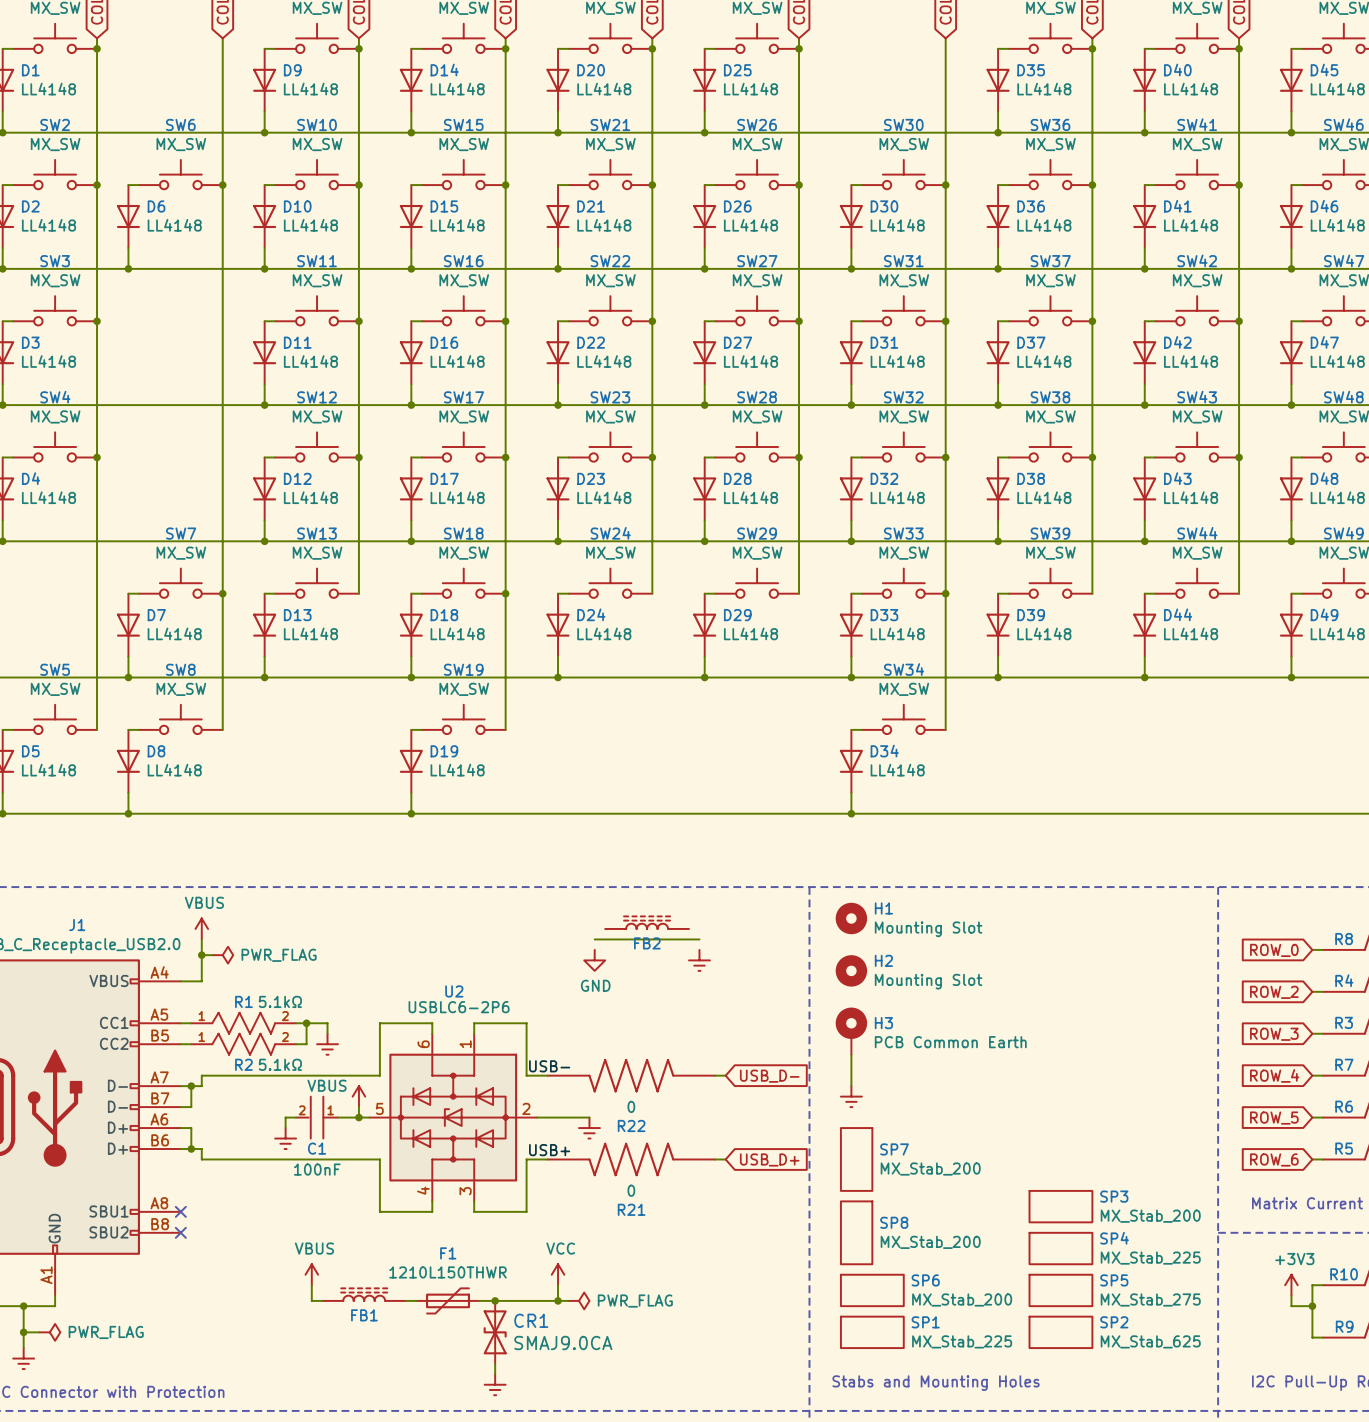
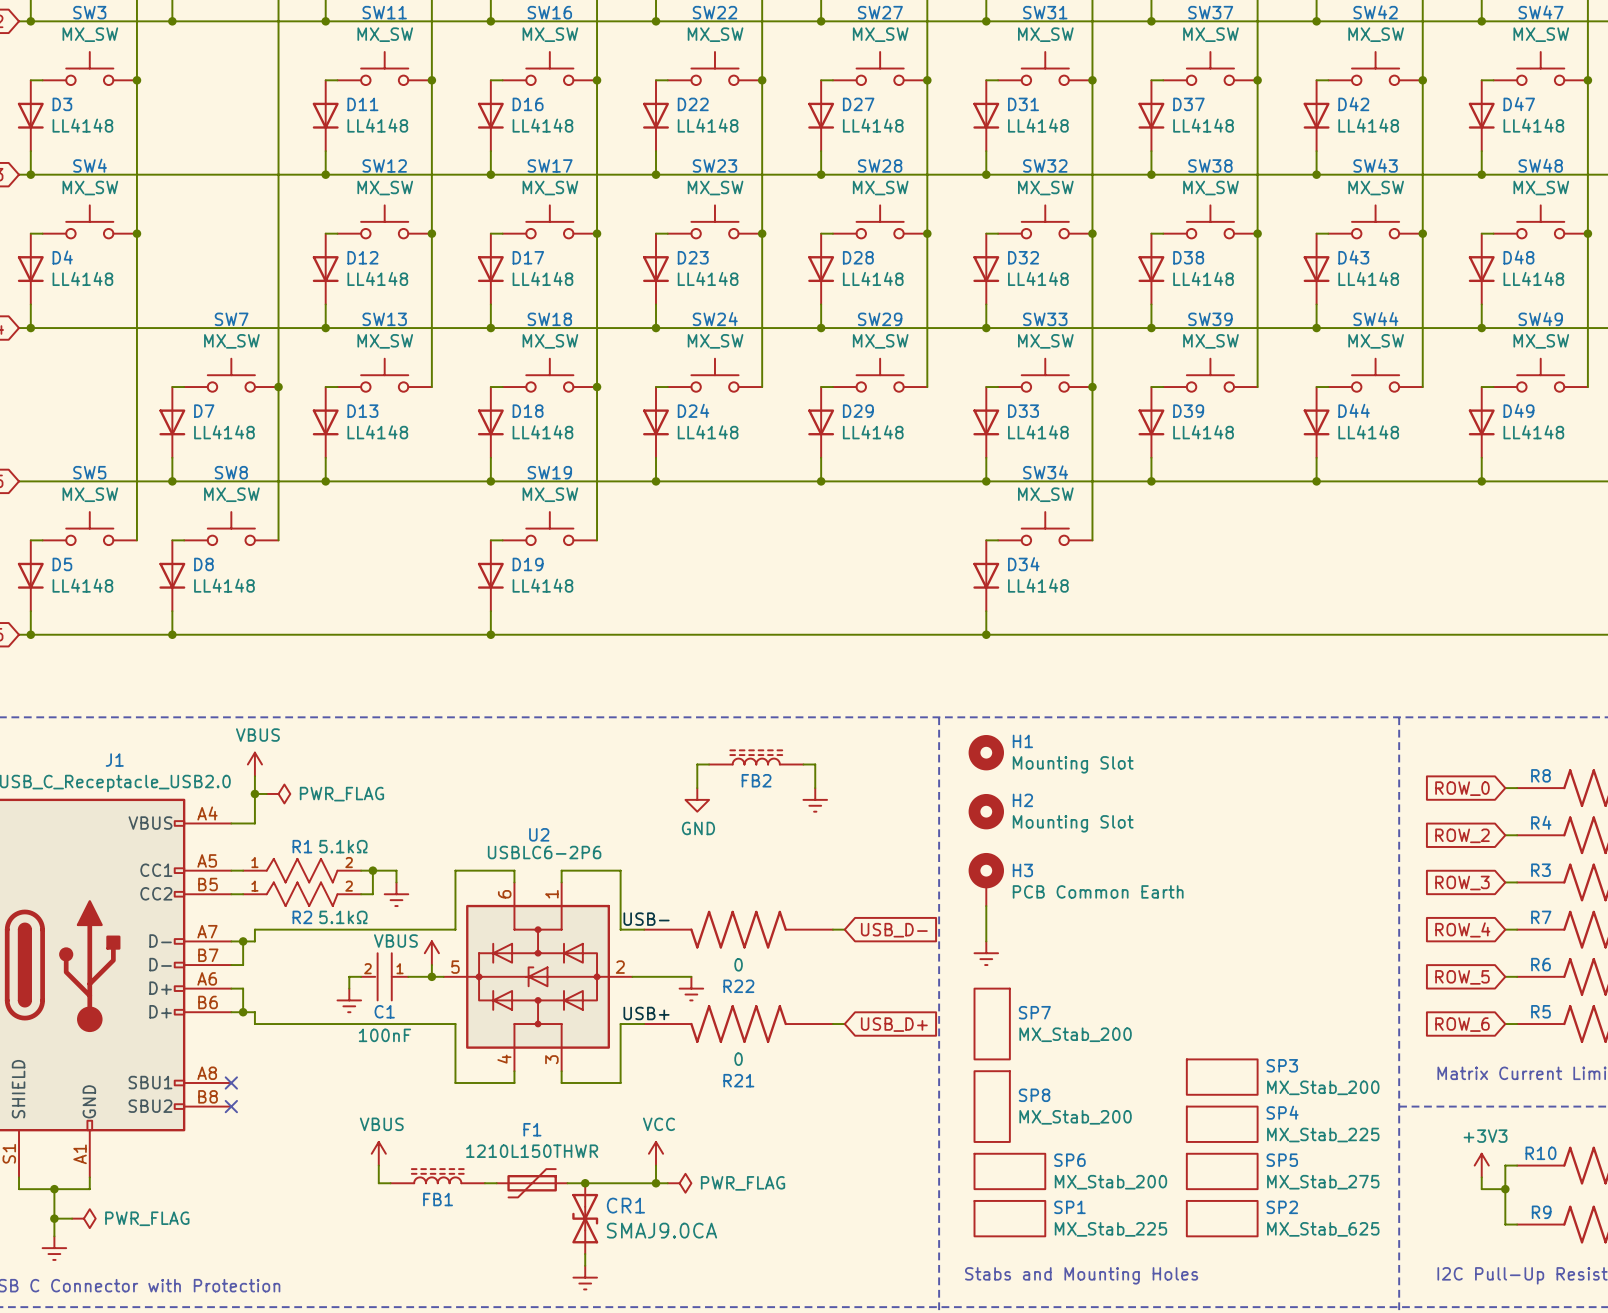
wire: none -> (709, 764) (697, 764) (697, 788)
wire: none -> (803, 764) (815, 764) (815, 788)
wire: (594, 939) (699, 939) -> none

